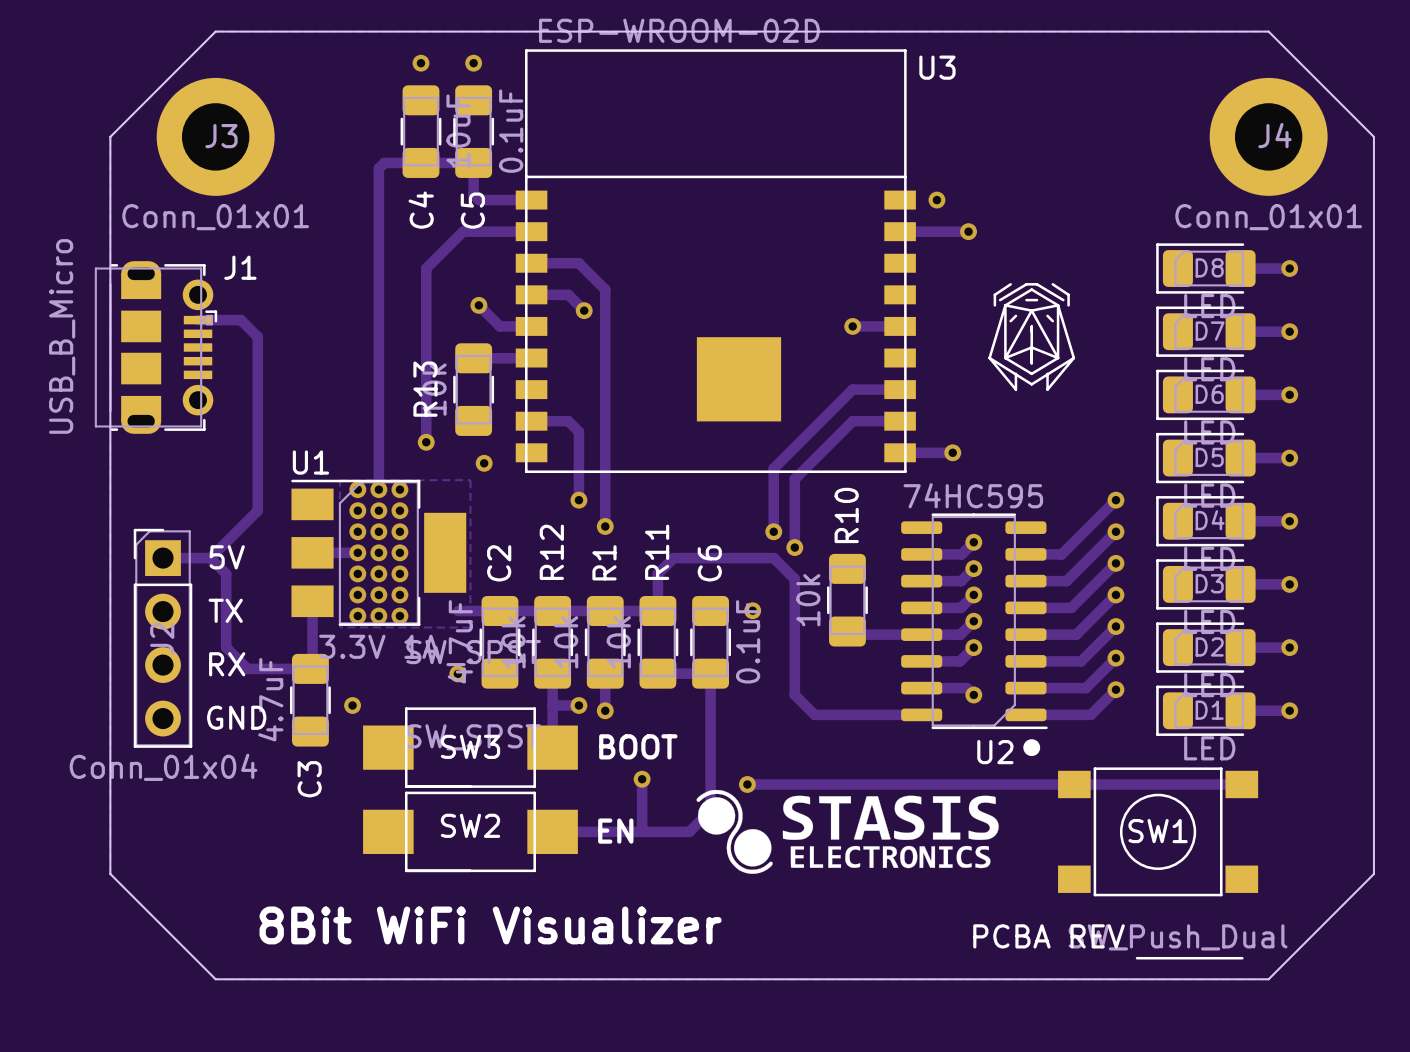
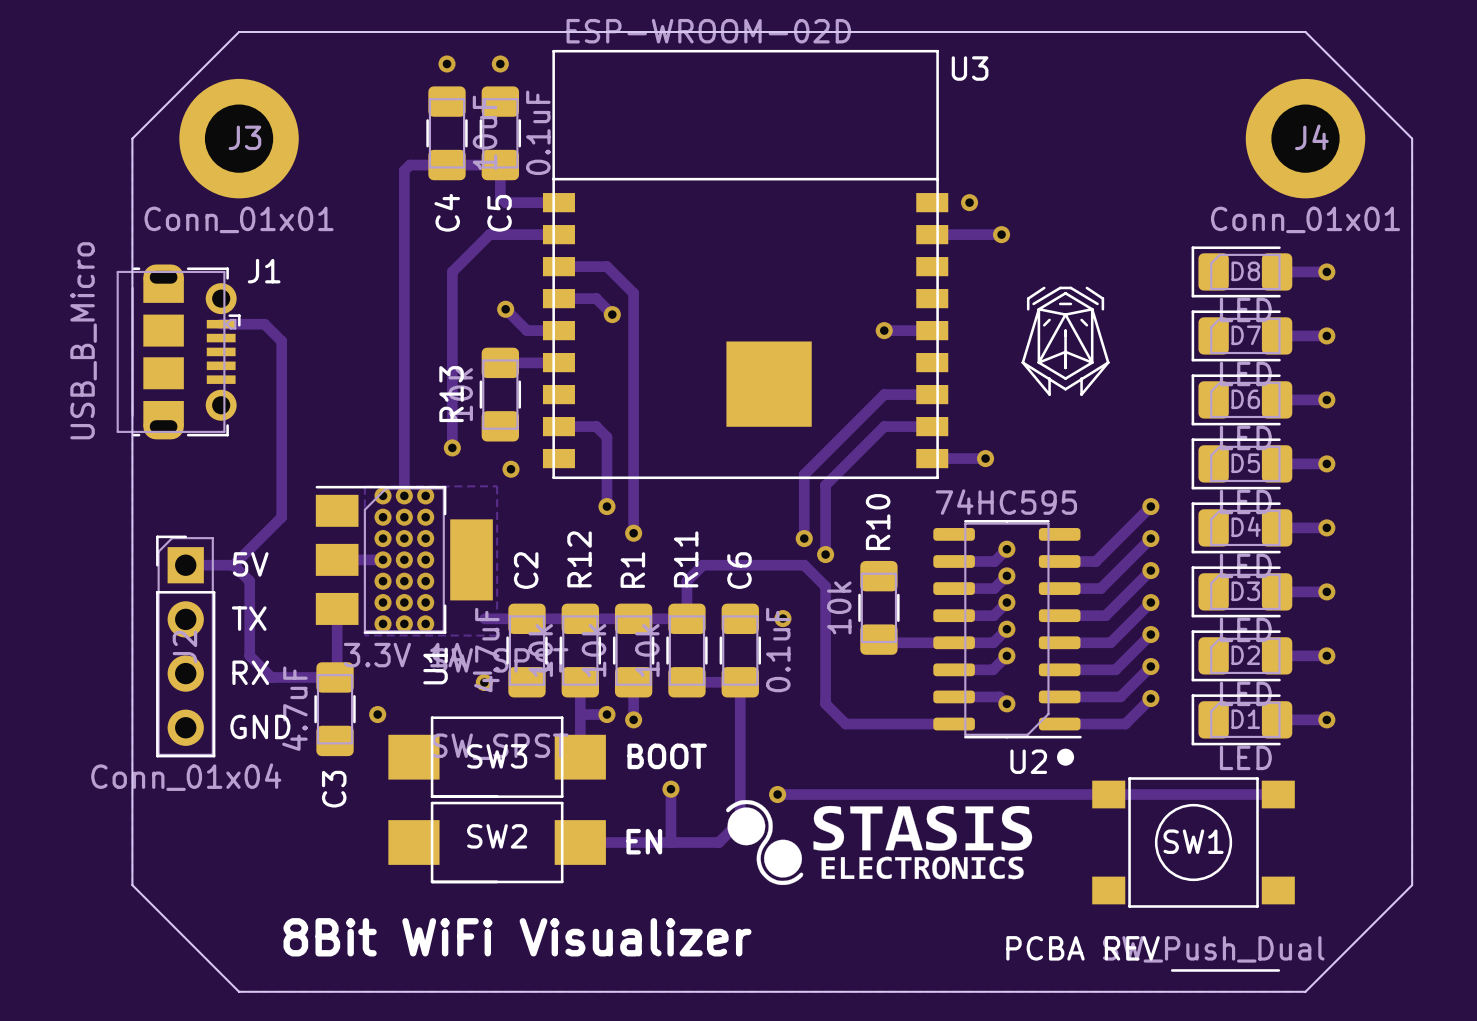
U1 name rotation: 0° (310, 462) -> 90° counterclockwise (435, 666)
U1 name position: U1 (310, 462) -> U1 (435, 666)

